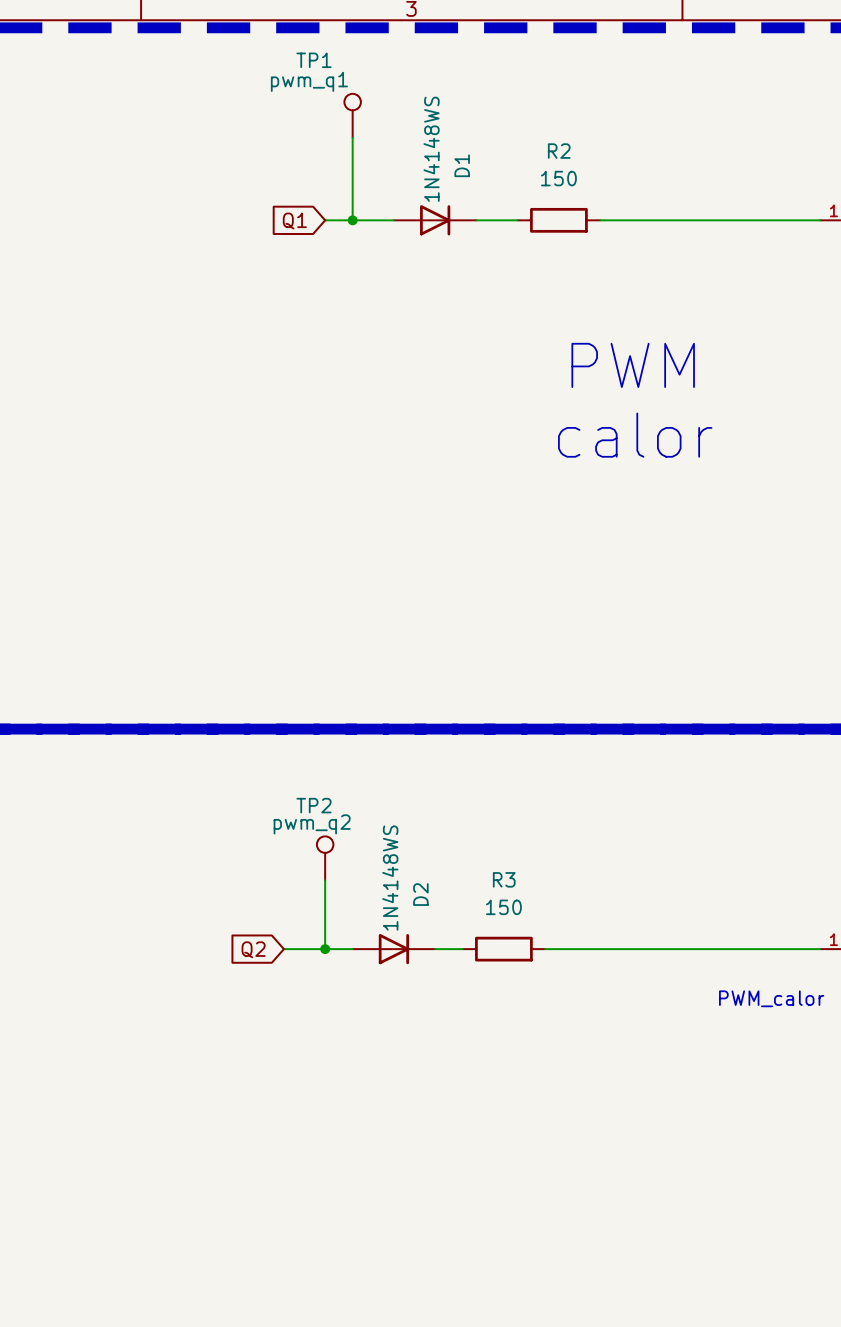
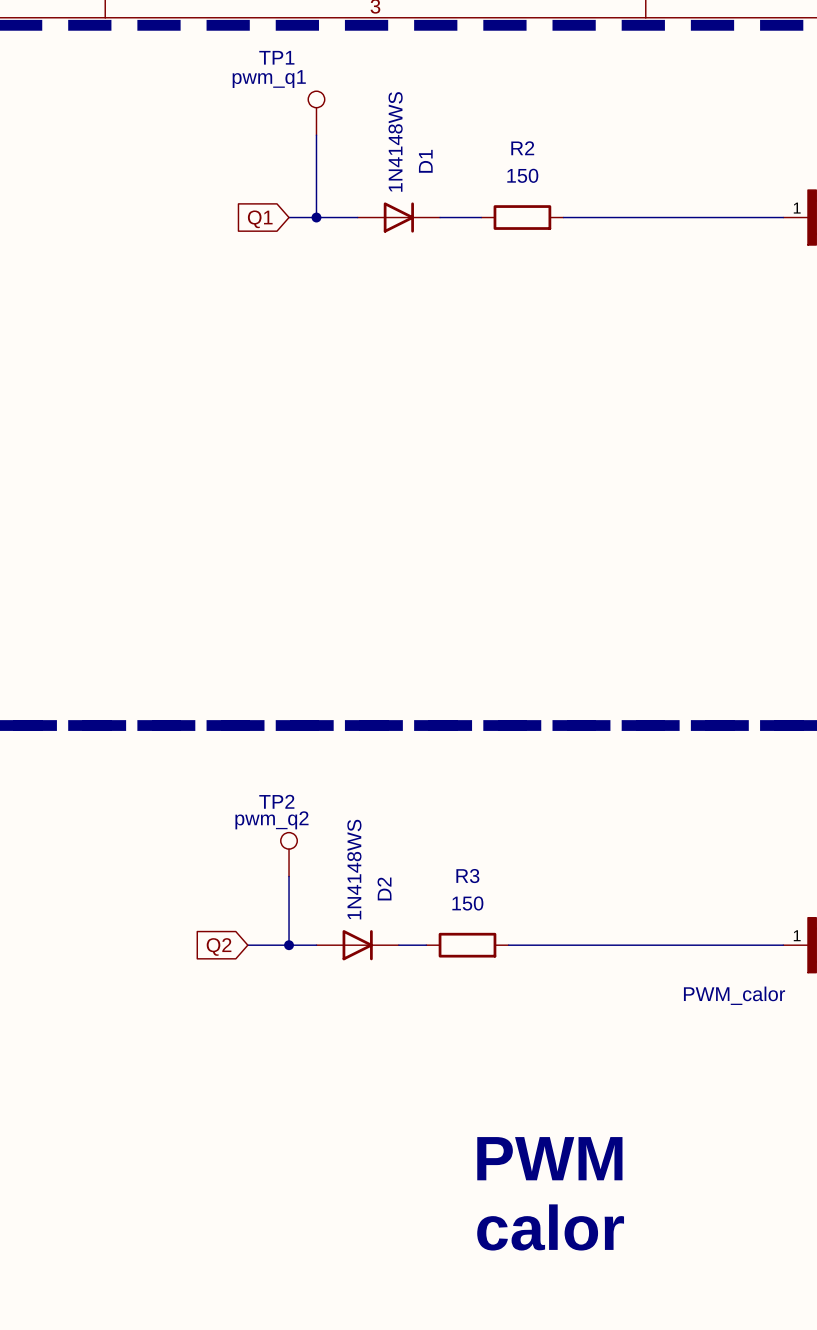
text: PWM (633, 365) -> none
text: calor (635, 435) -> none
text: none -> PWM (549, 1158)
text: none -> calor (550, 1227)

